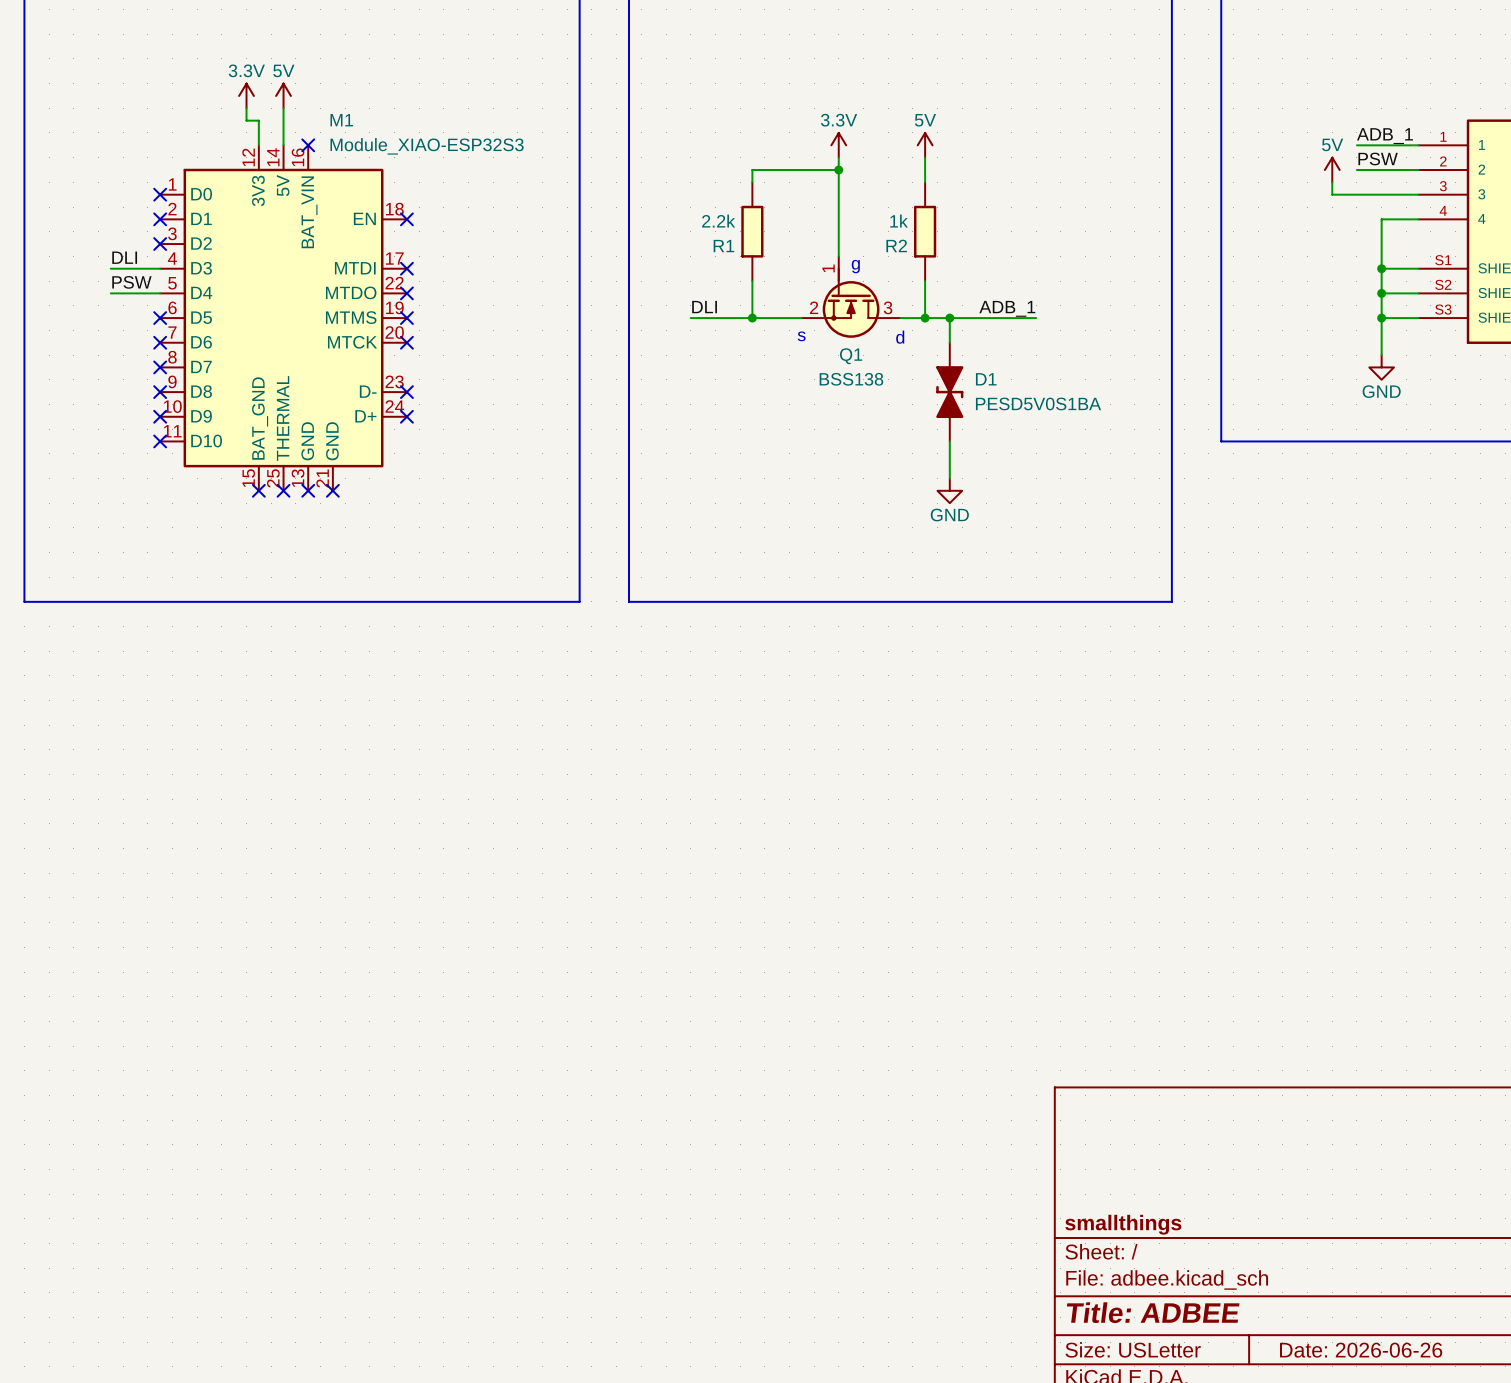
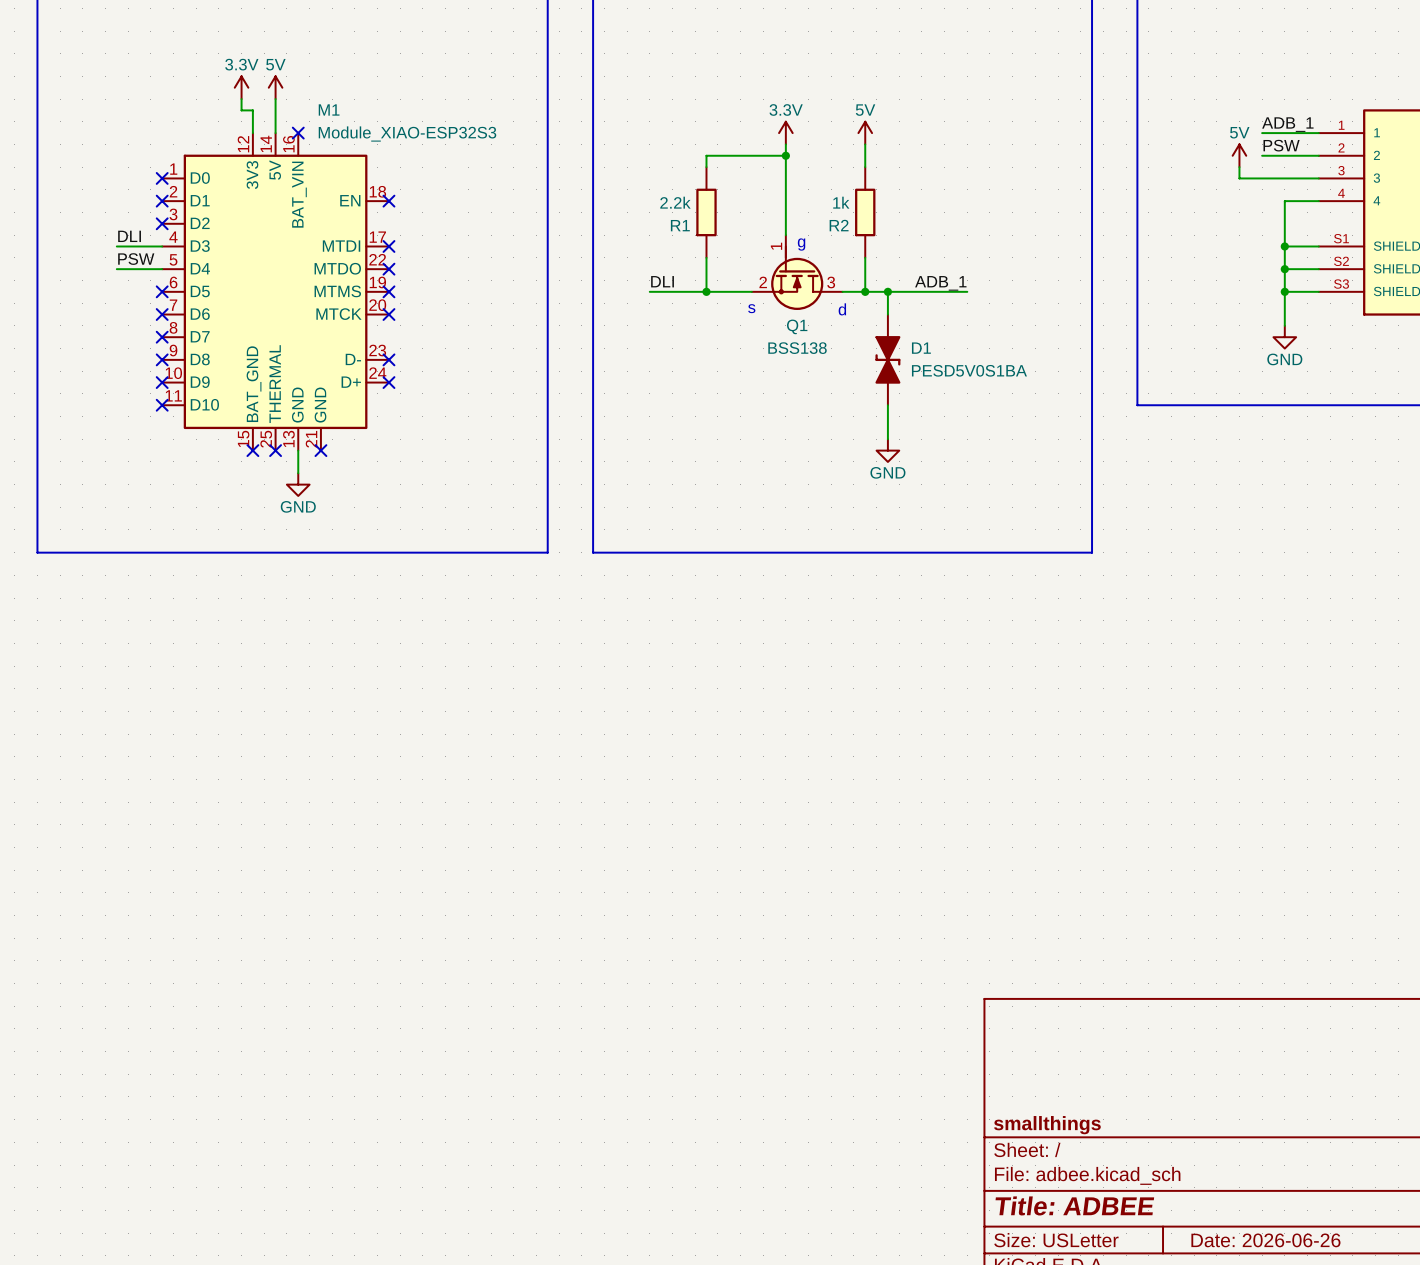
wire: none -> (298, 450) (298, 473)
no-connect mark: (308, 490) -> none
power symbol: none -> GND (298, 484)

